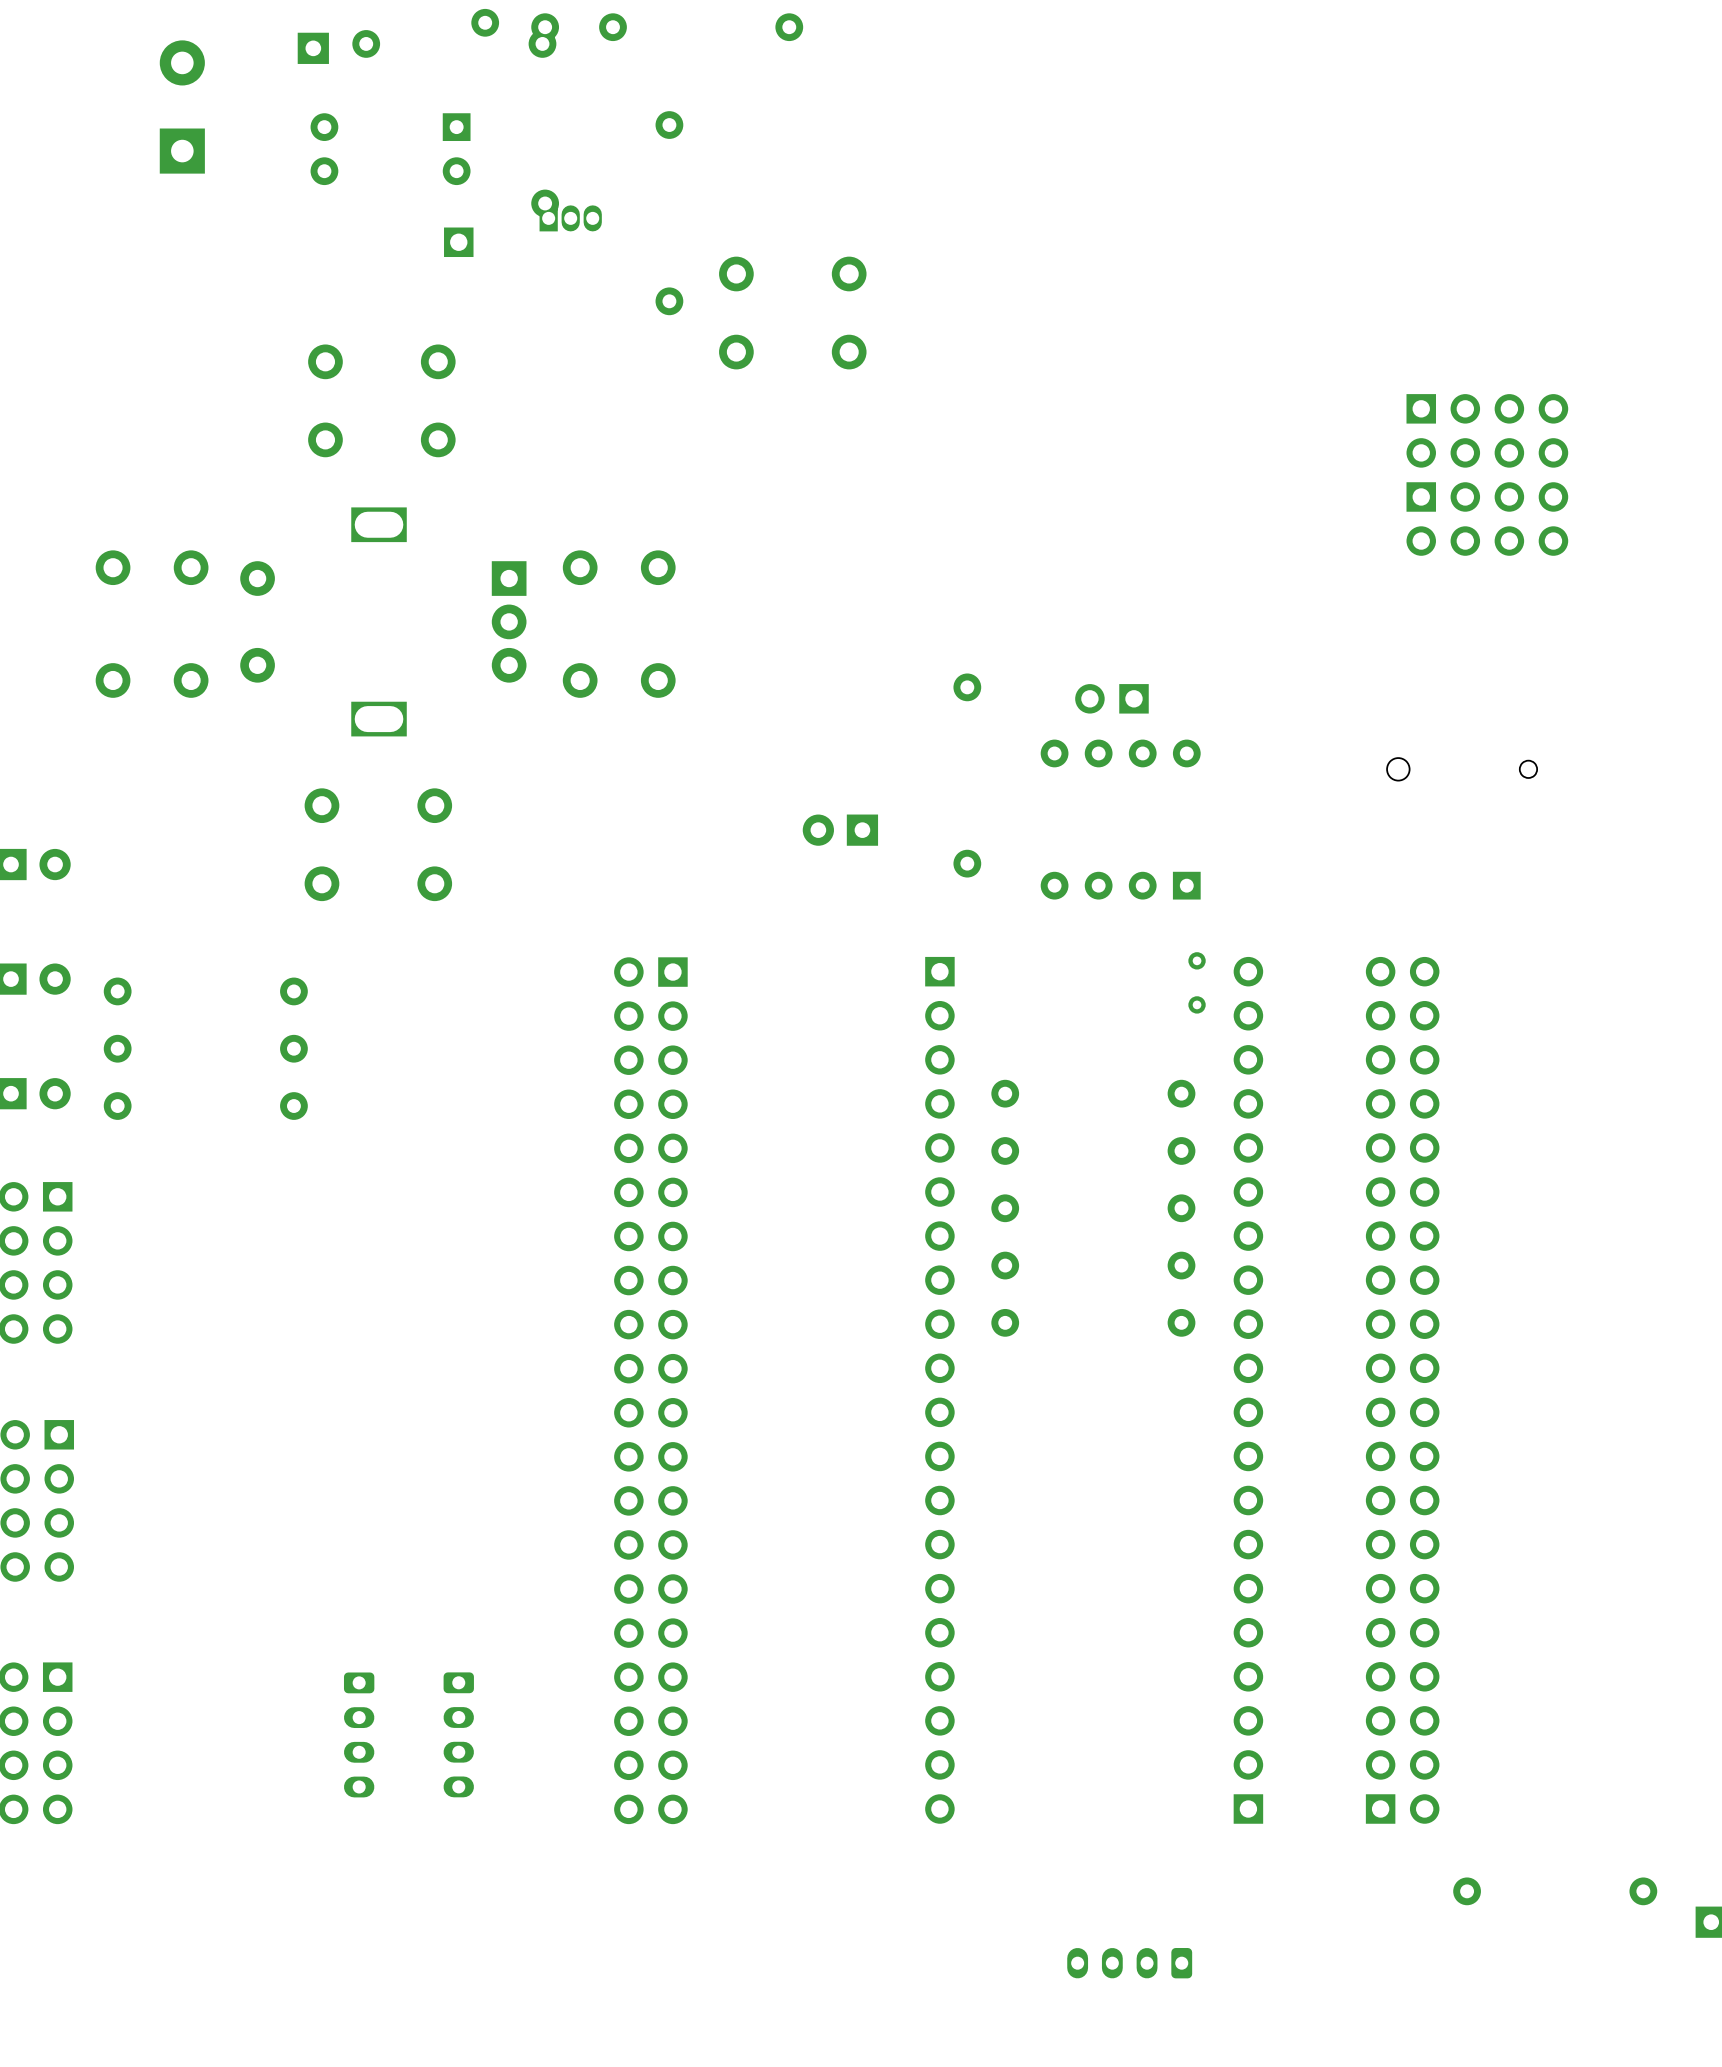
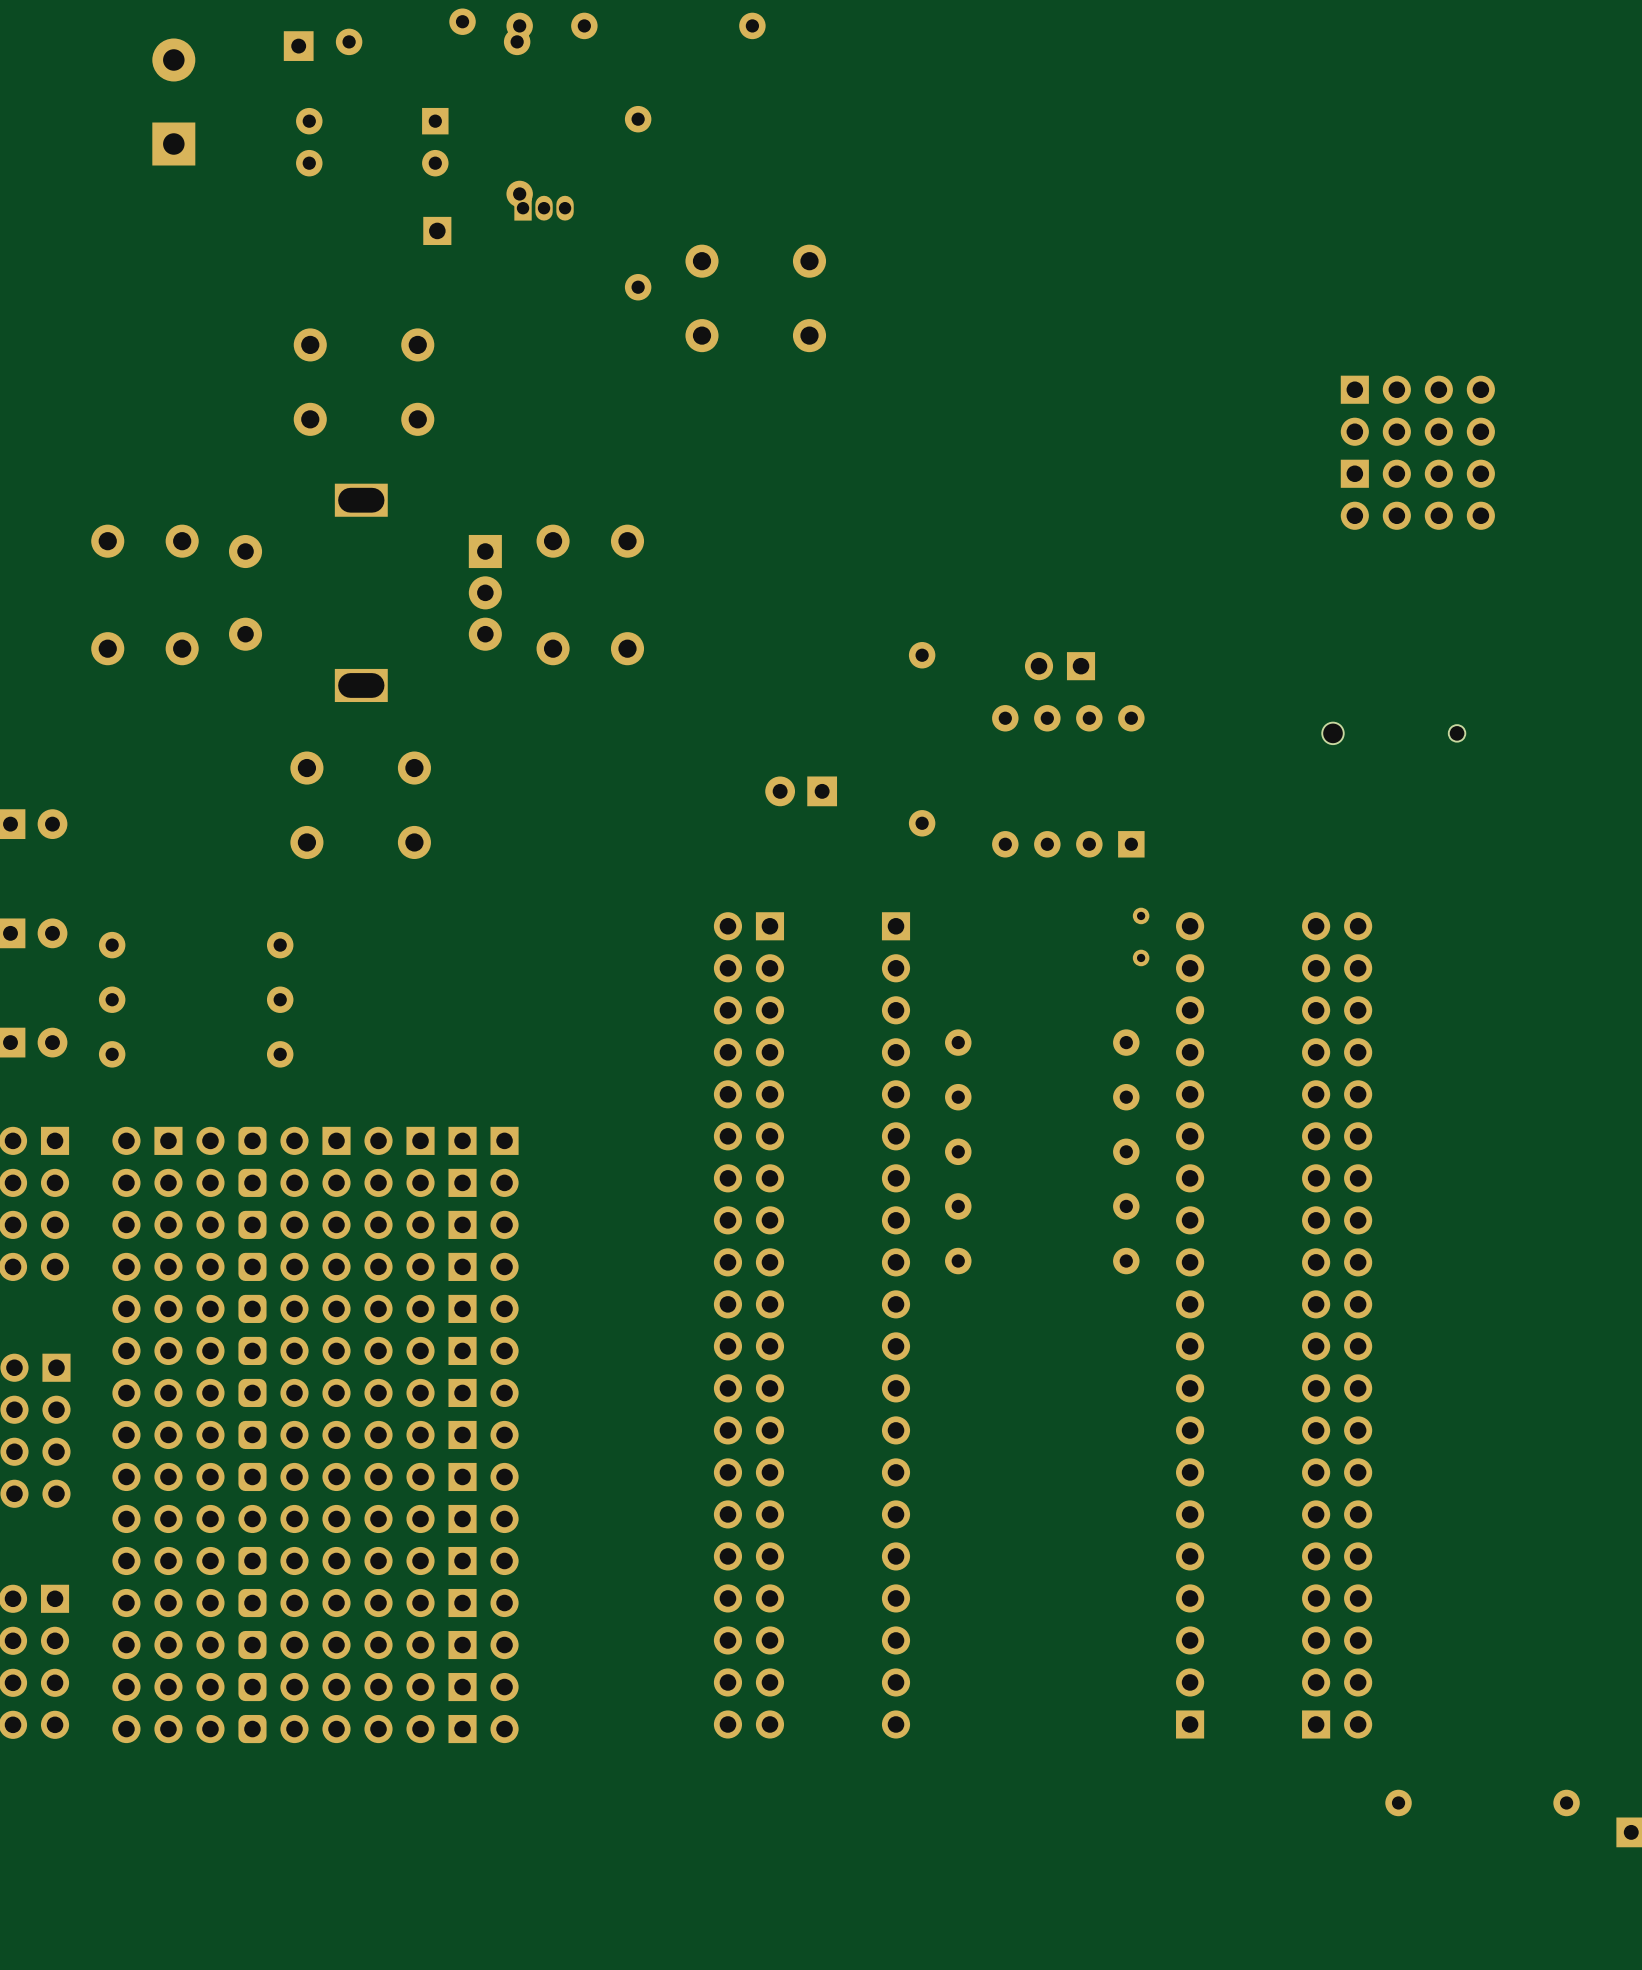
part position: (650, 1390) -> (748, 1325)
part: none -> (147, 1434)
part: none -> (231, 1434)
part: none -> (315, 1434)
part: none -> (399, 1434)
part: none -> (483, 1434)
part: (359, 1734) -> none
part: (458, 1734) -> none
part: (1129, 1963) -> none

